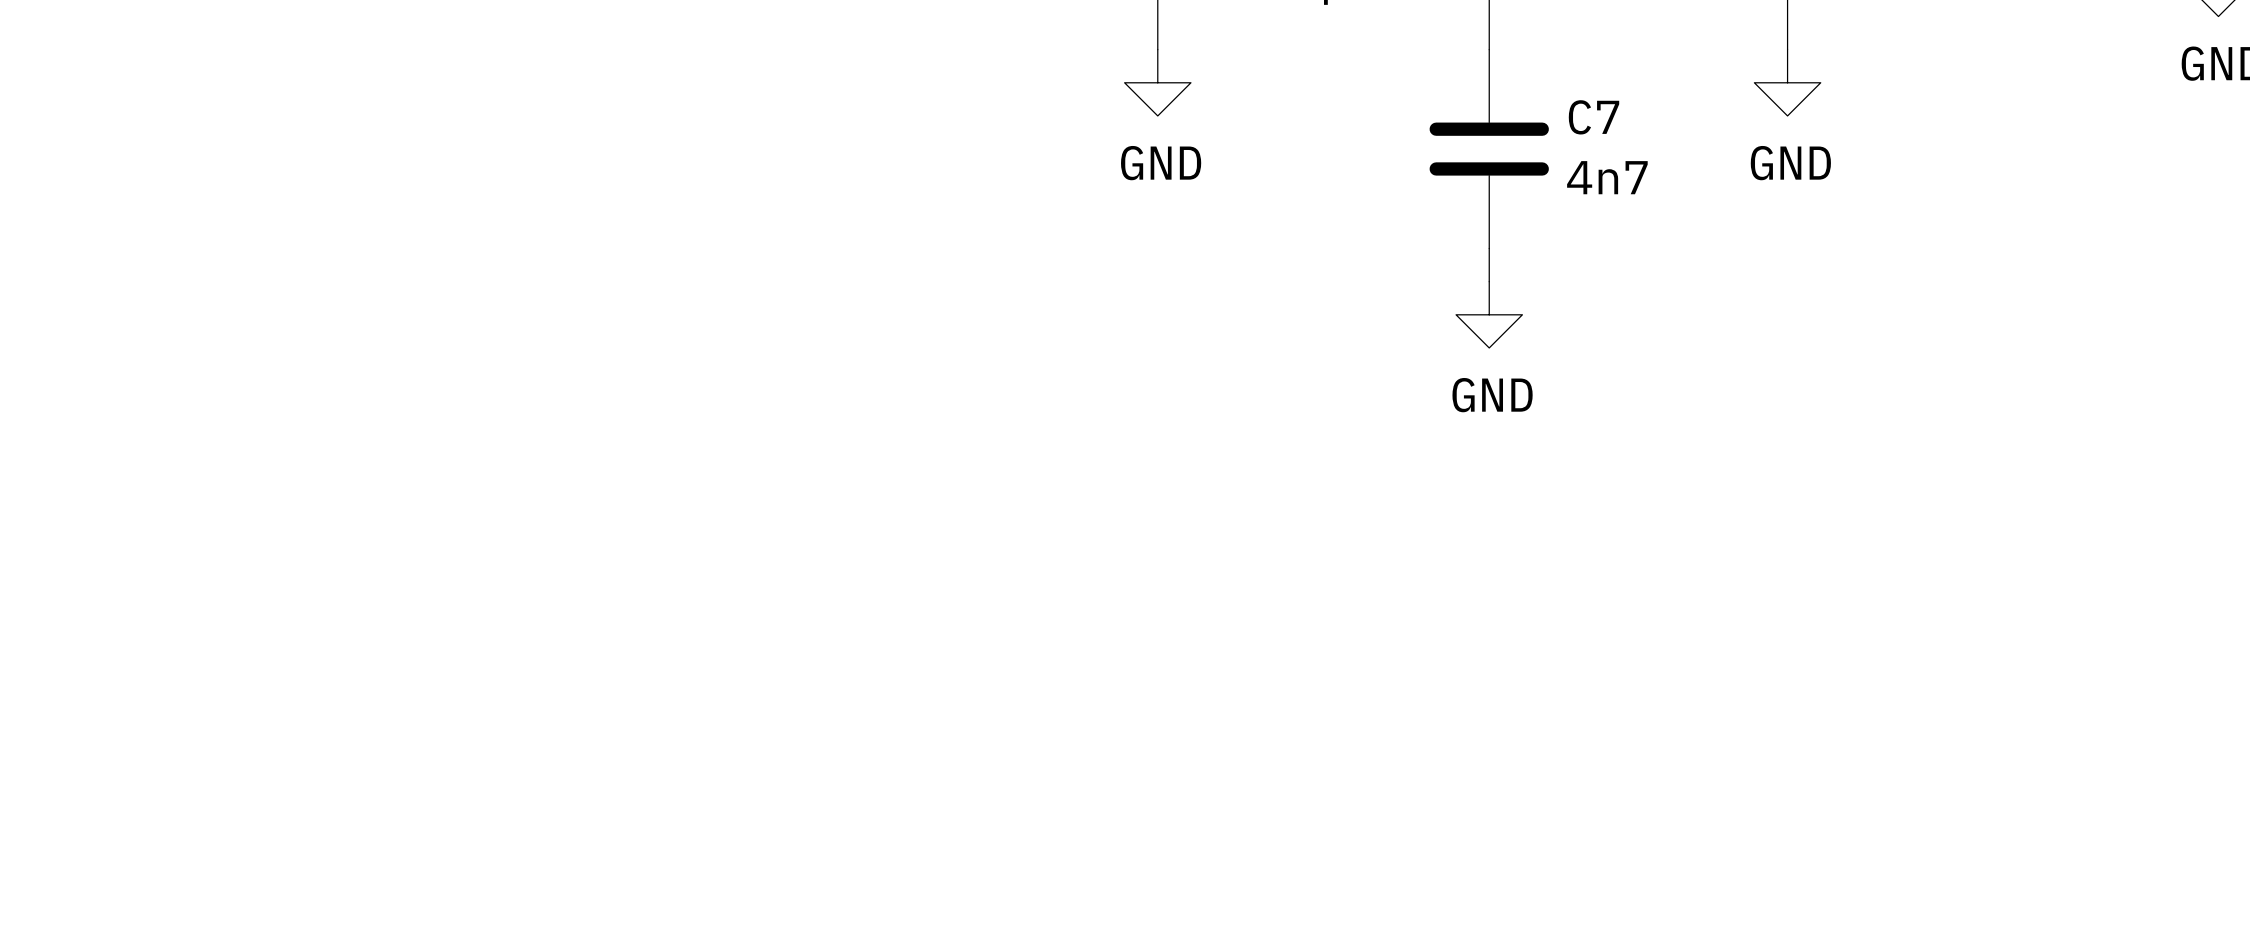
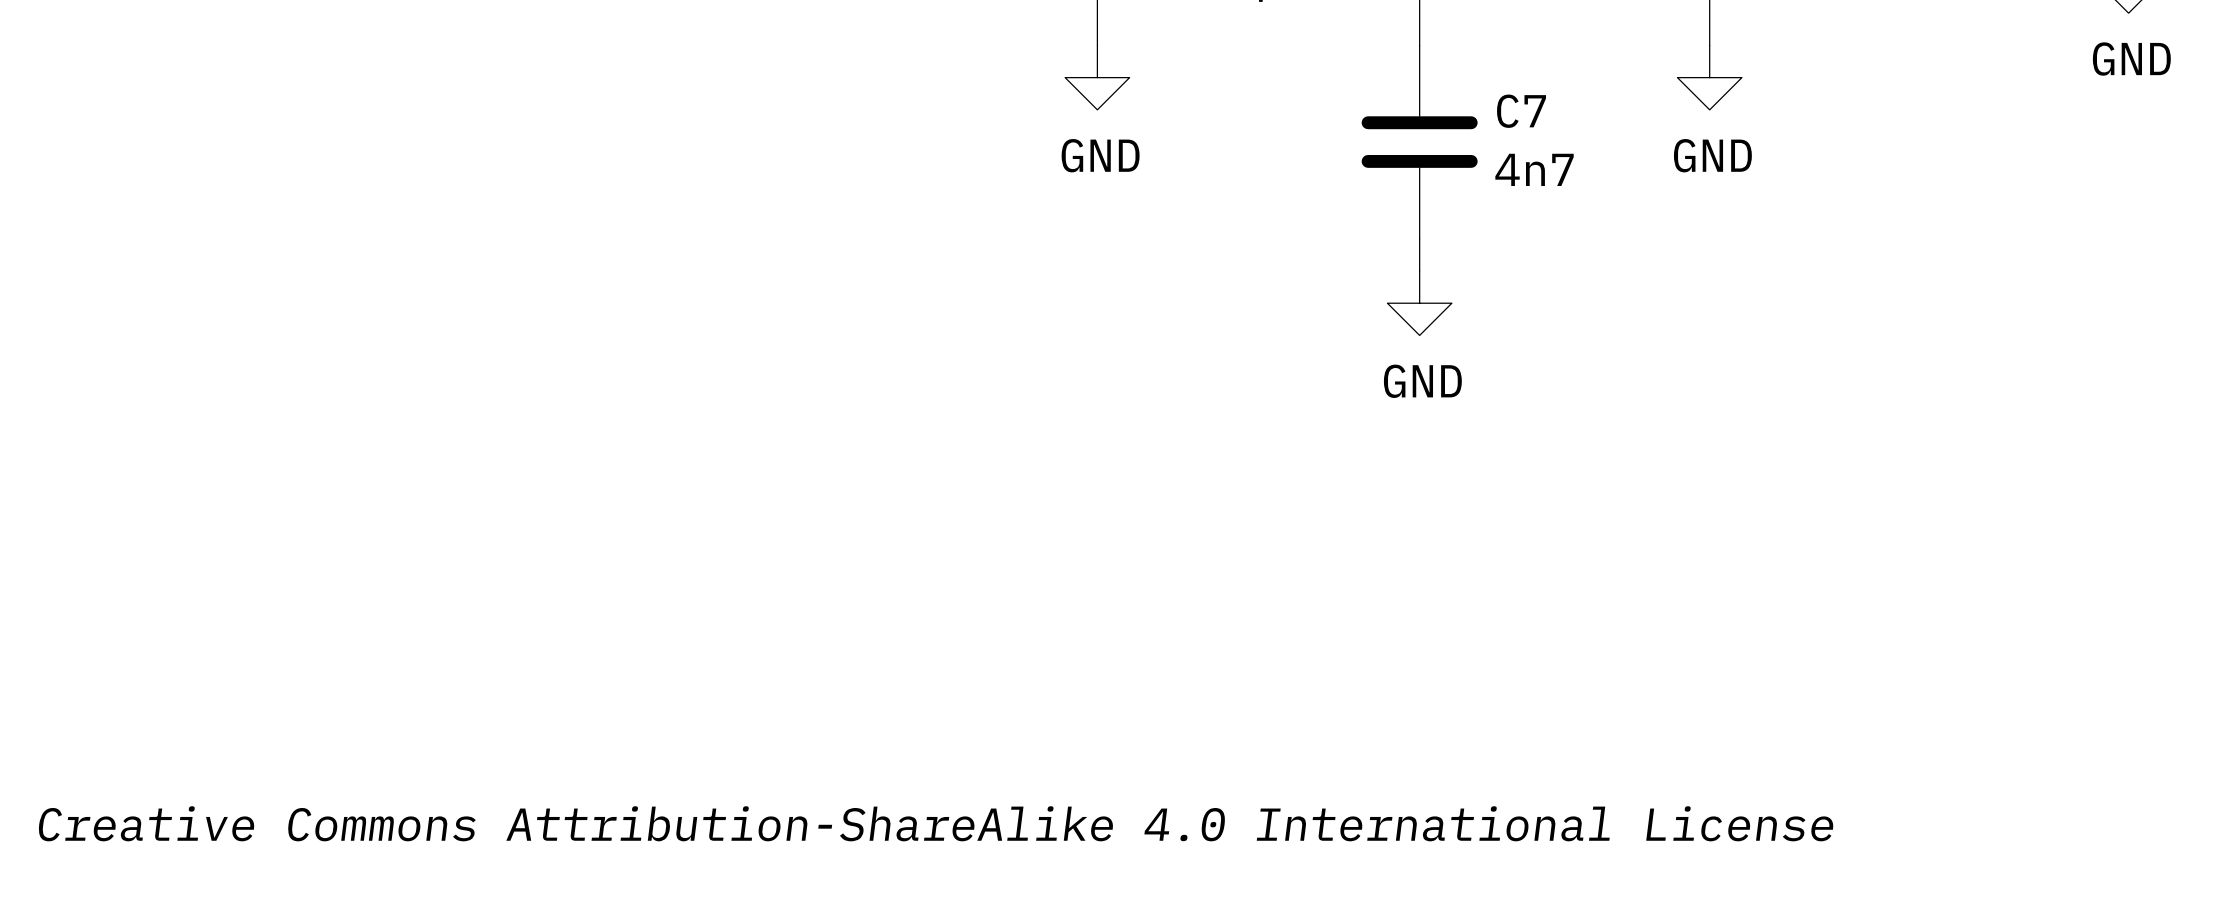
text: none -> Creative Commons Attribution-ShareAlike 4.0 International License (935, 823)

